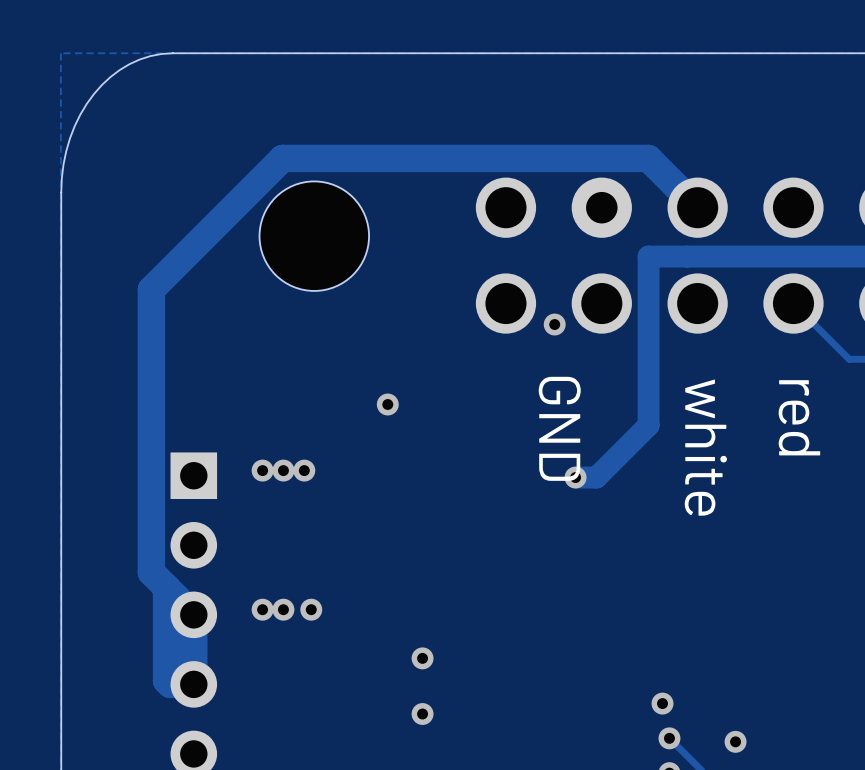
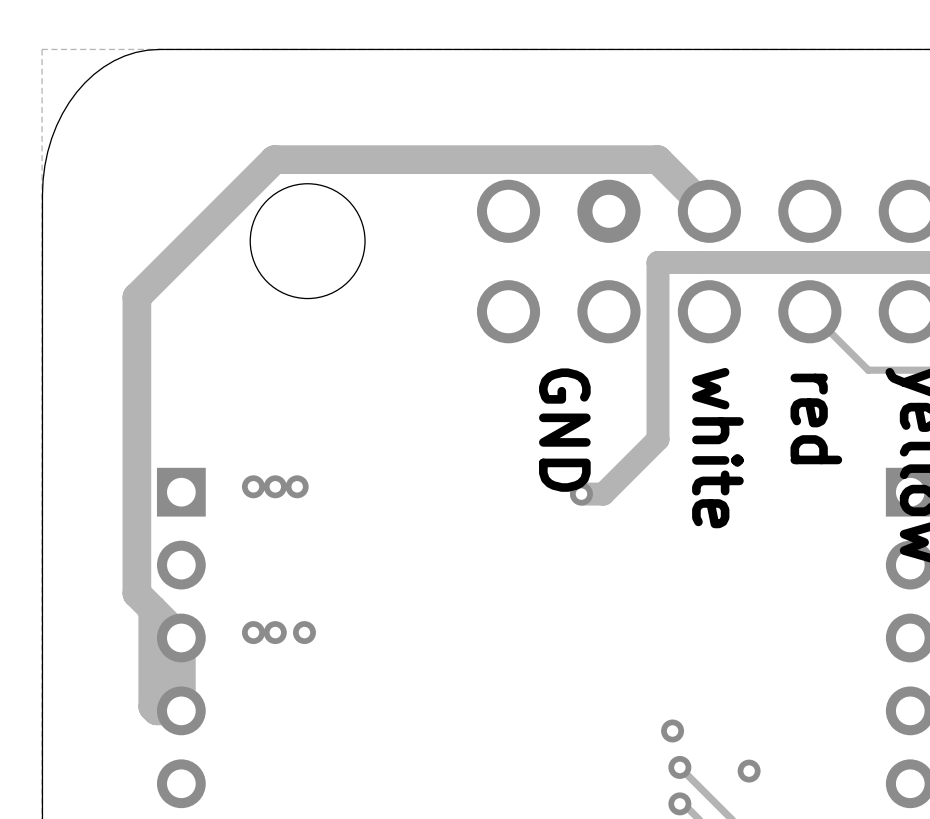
via: (554, 324) -> none
via: (387, 404) -> none
via: (422, 658) -> none
via: (422, 714) -> none

